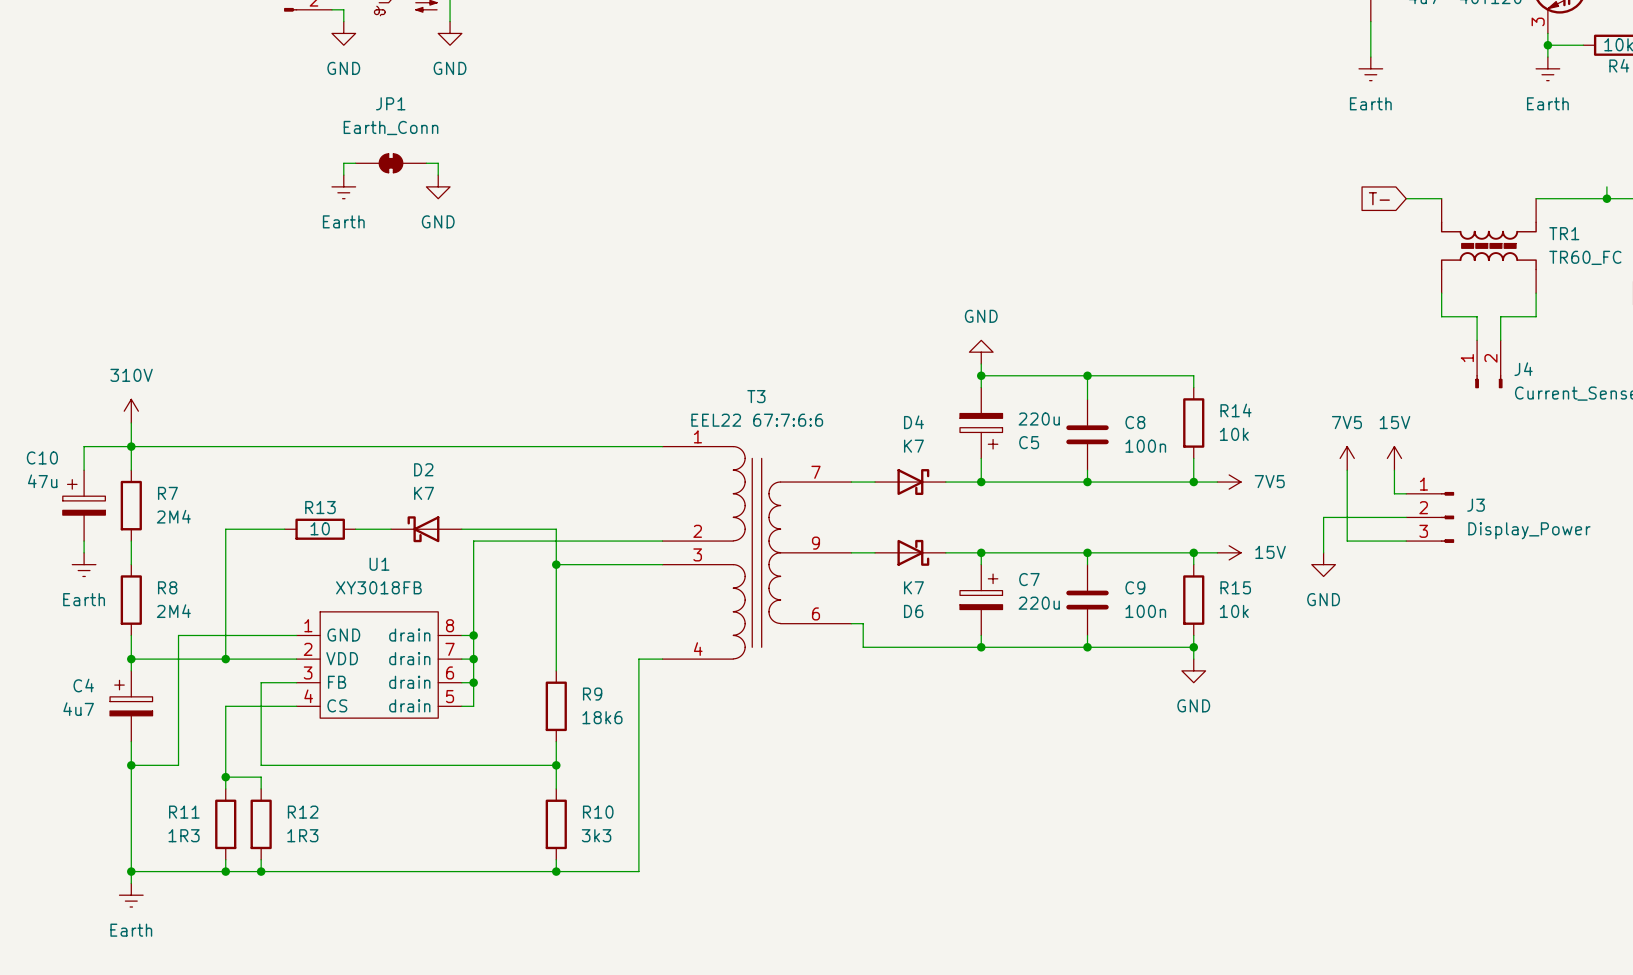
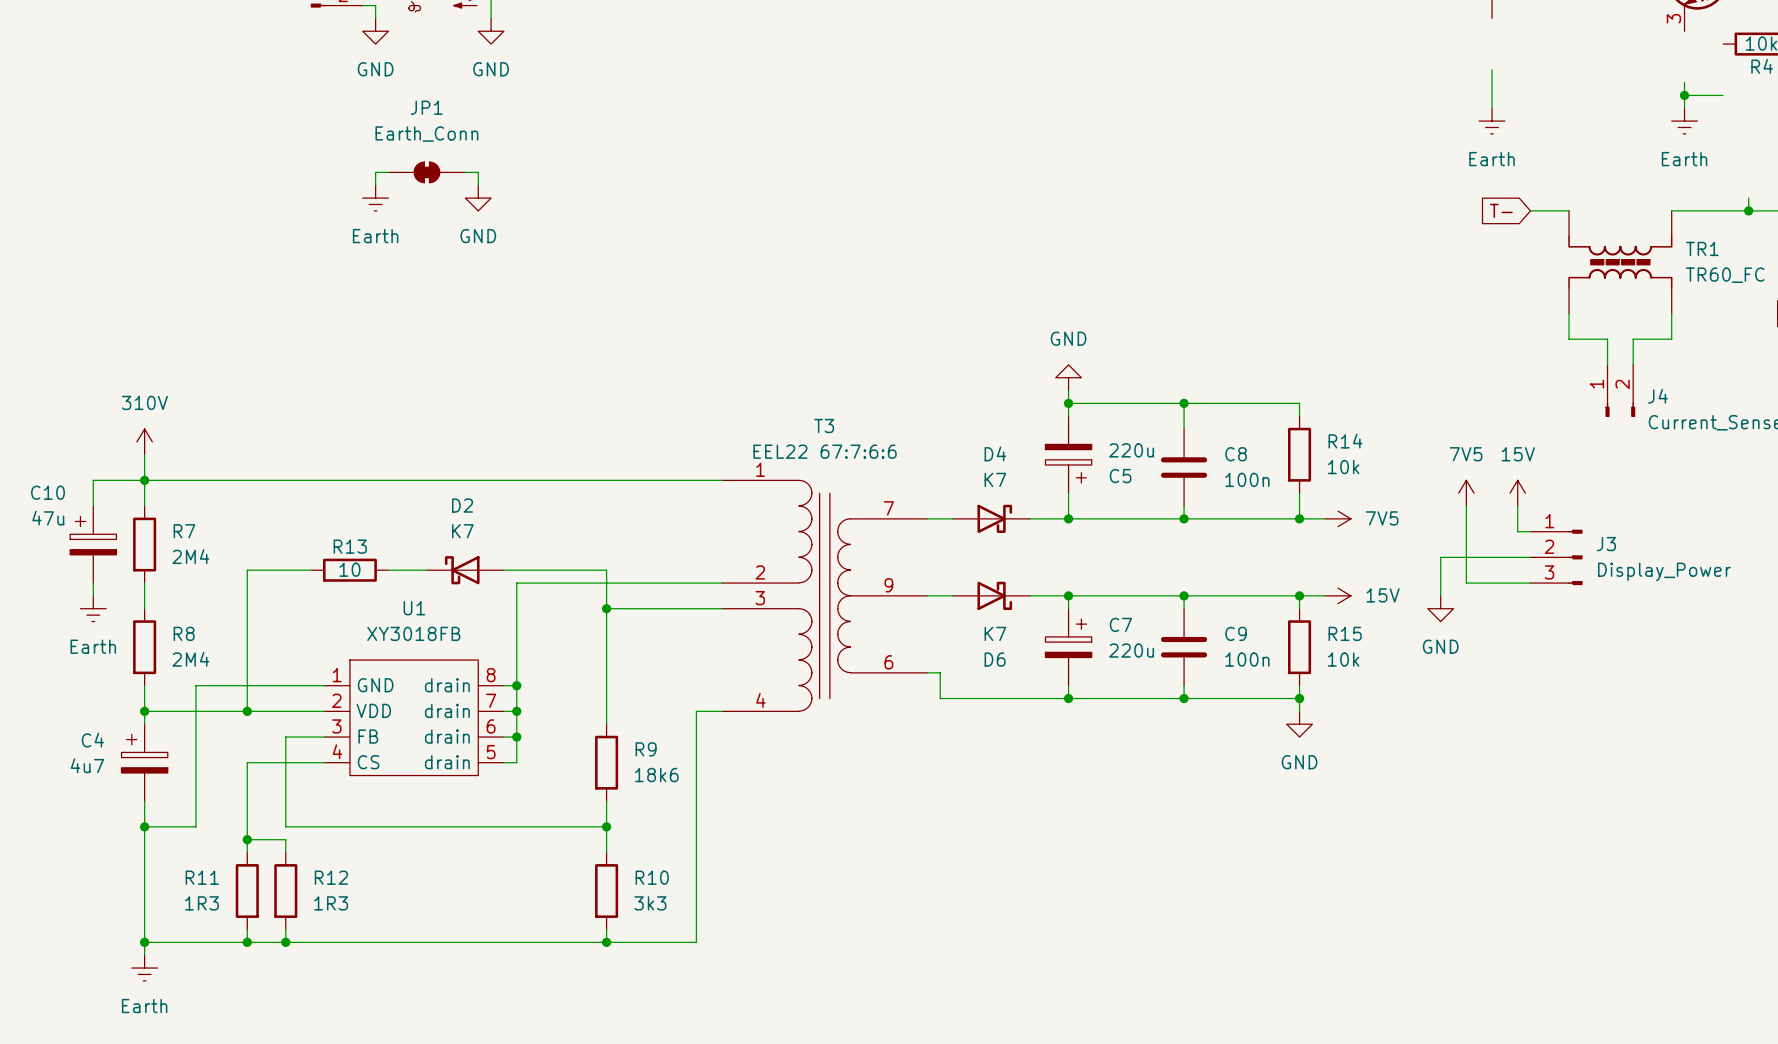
wire: (1370, 21) (1370, 57) -> (1492, 69) (1492, 108)
wire: (1547, 33) (1547, 57) -> (1684, 82) (1684, 108)
wire: (1547, 45) (1583, 45) -> (1684, 95) (1723, 95)
junction: (1547, 45) -> none
power symbol position: Earth (1370, 68) -> Earth (1492, 121)
power symbol position: Earth (1547, 68) -> Earth (1684, 121)
junction: none -> (1684, 95)

